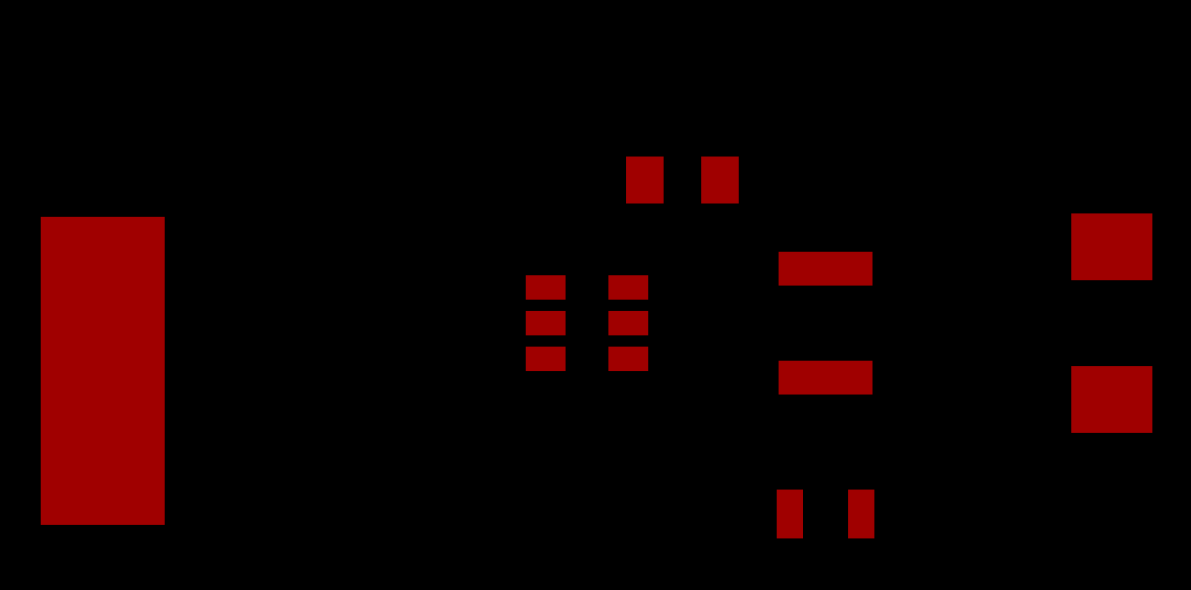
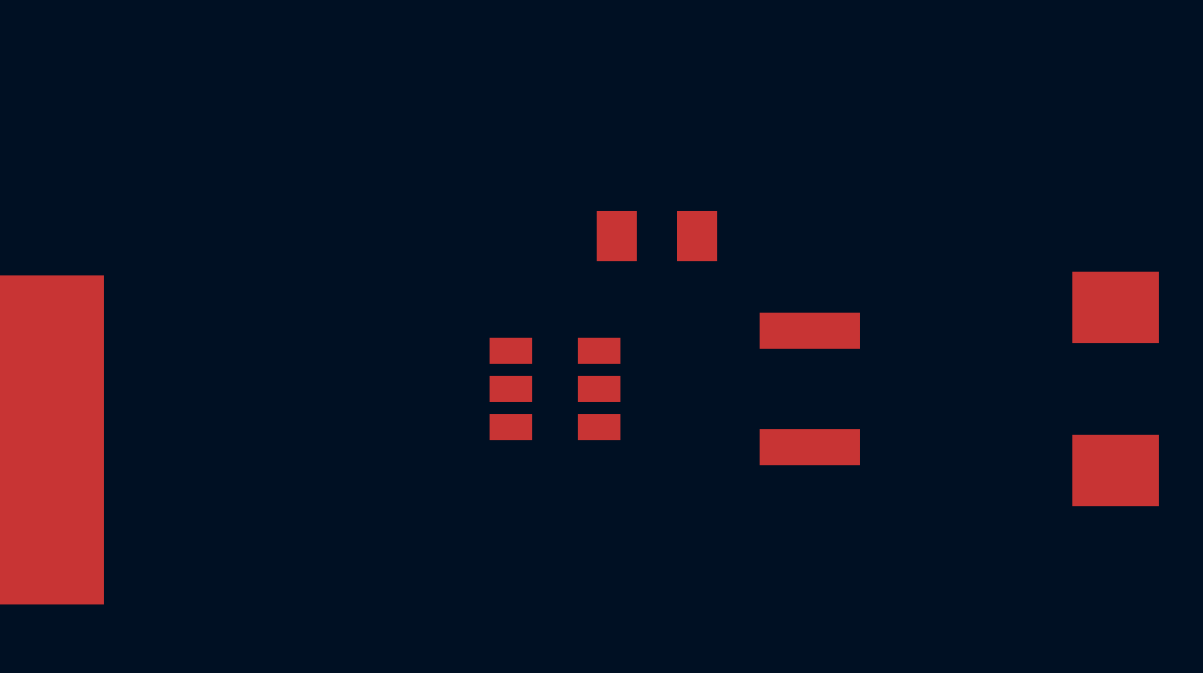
part: (825, 514) -> none

